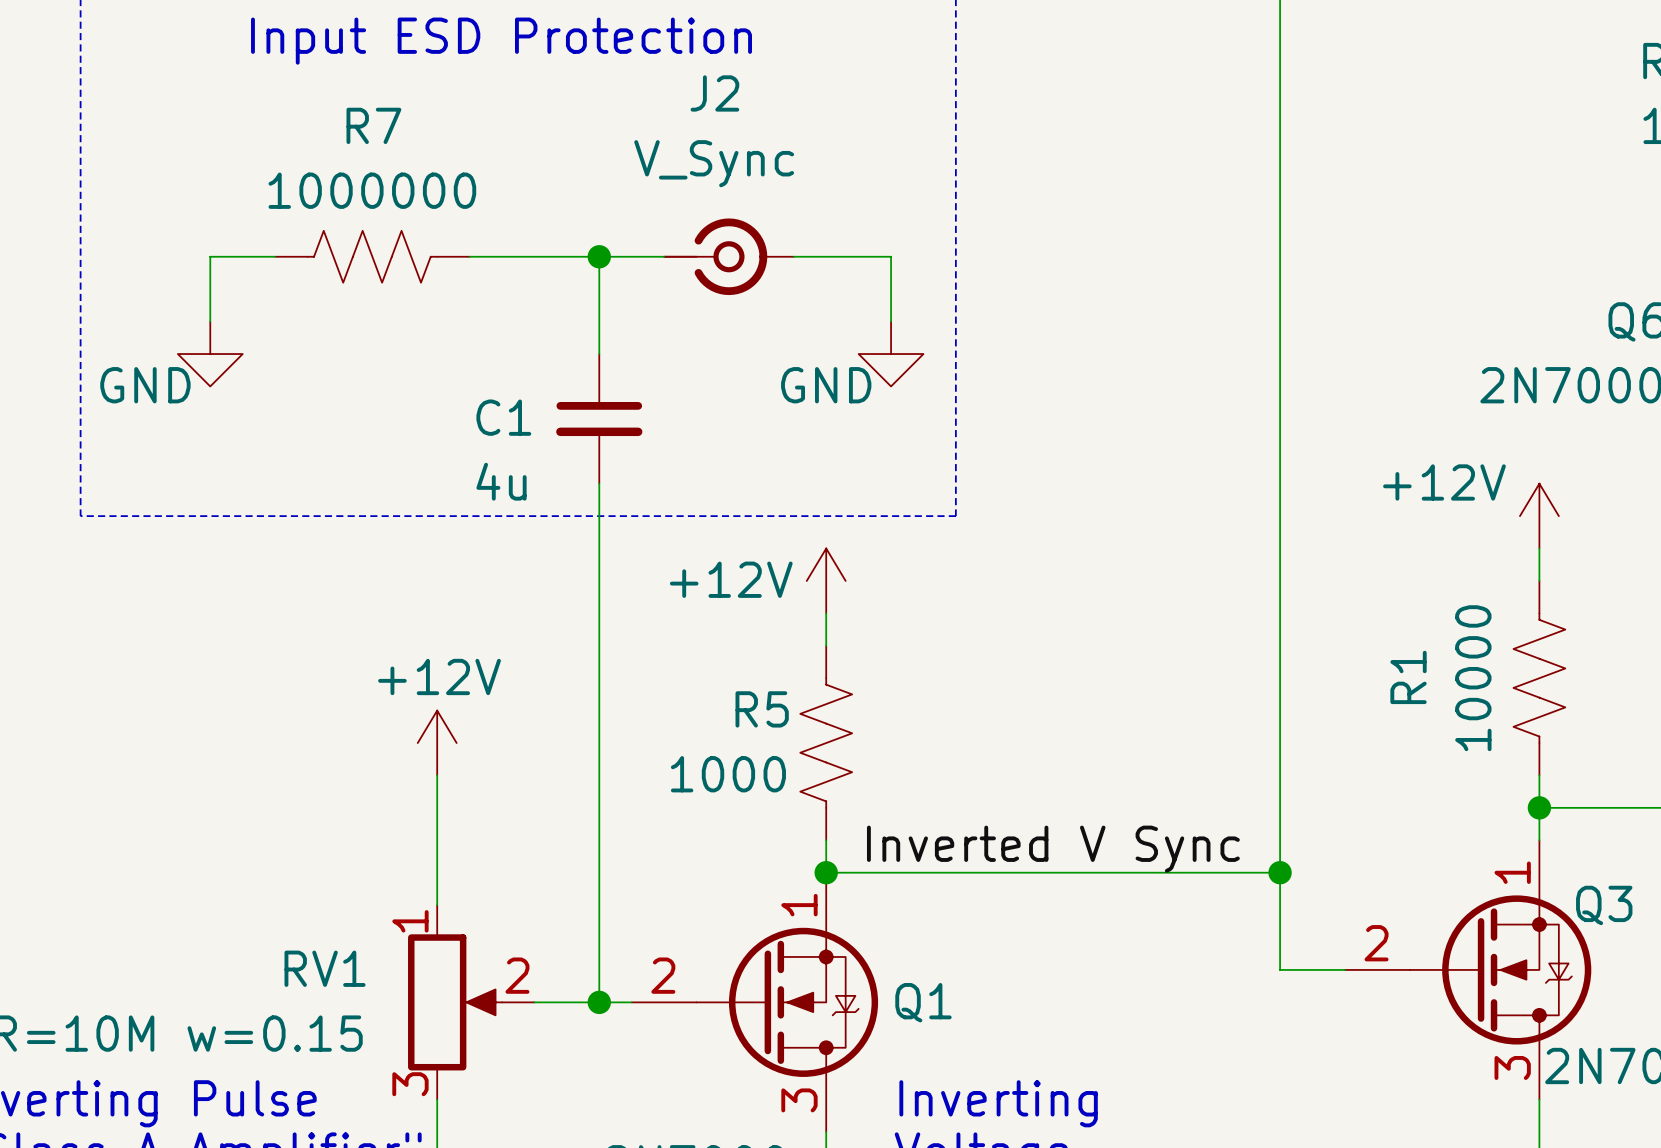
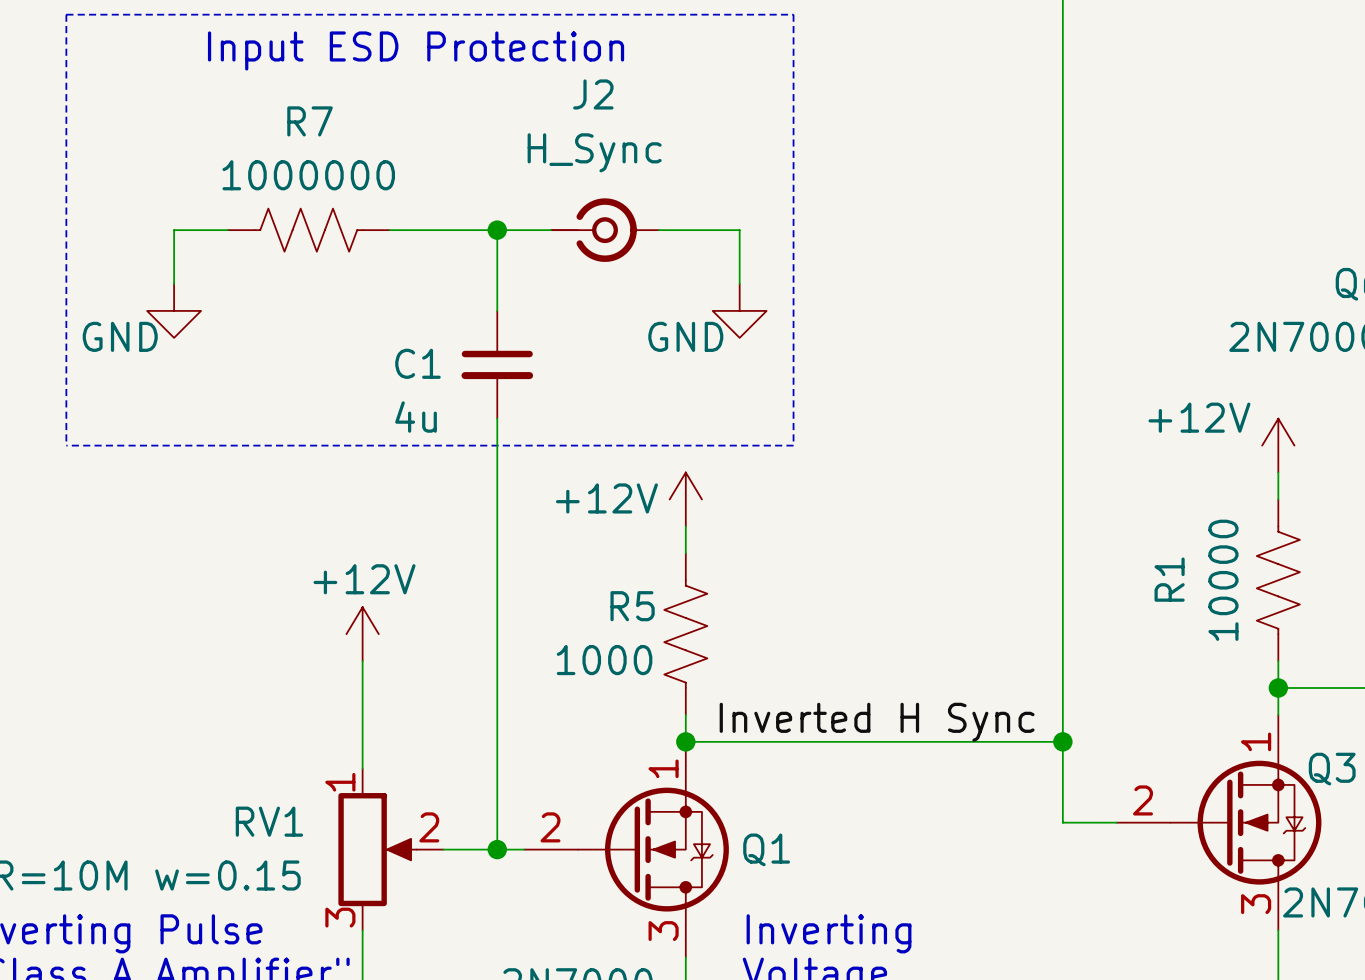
J2 value: V_Sync (714, 163) -> H_Sync (594, 152)
label: Inverted V Sync (1053, 849) -> Inverted H Sync (877, 722)

